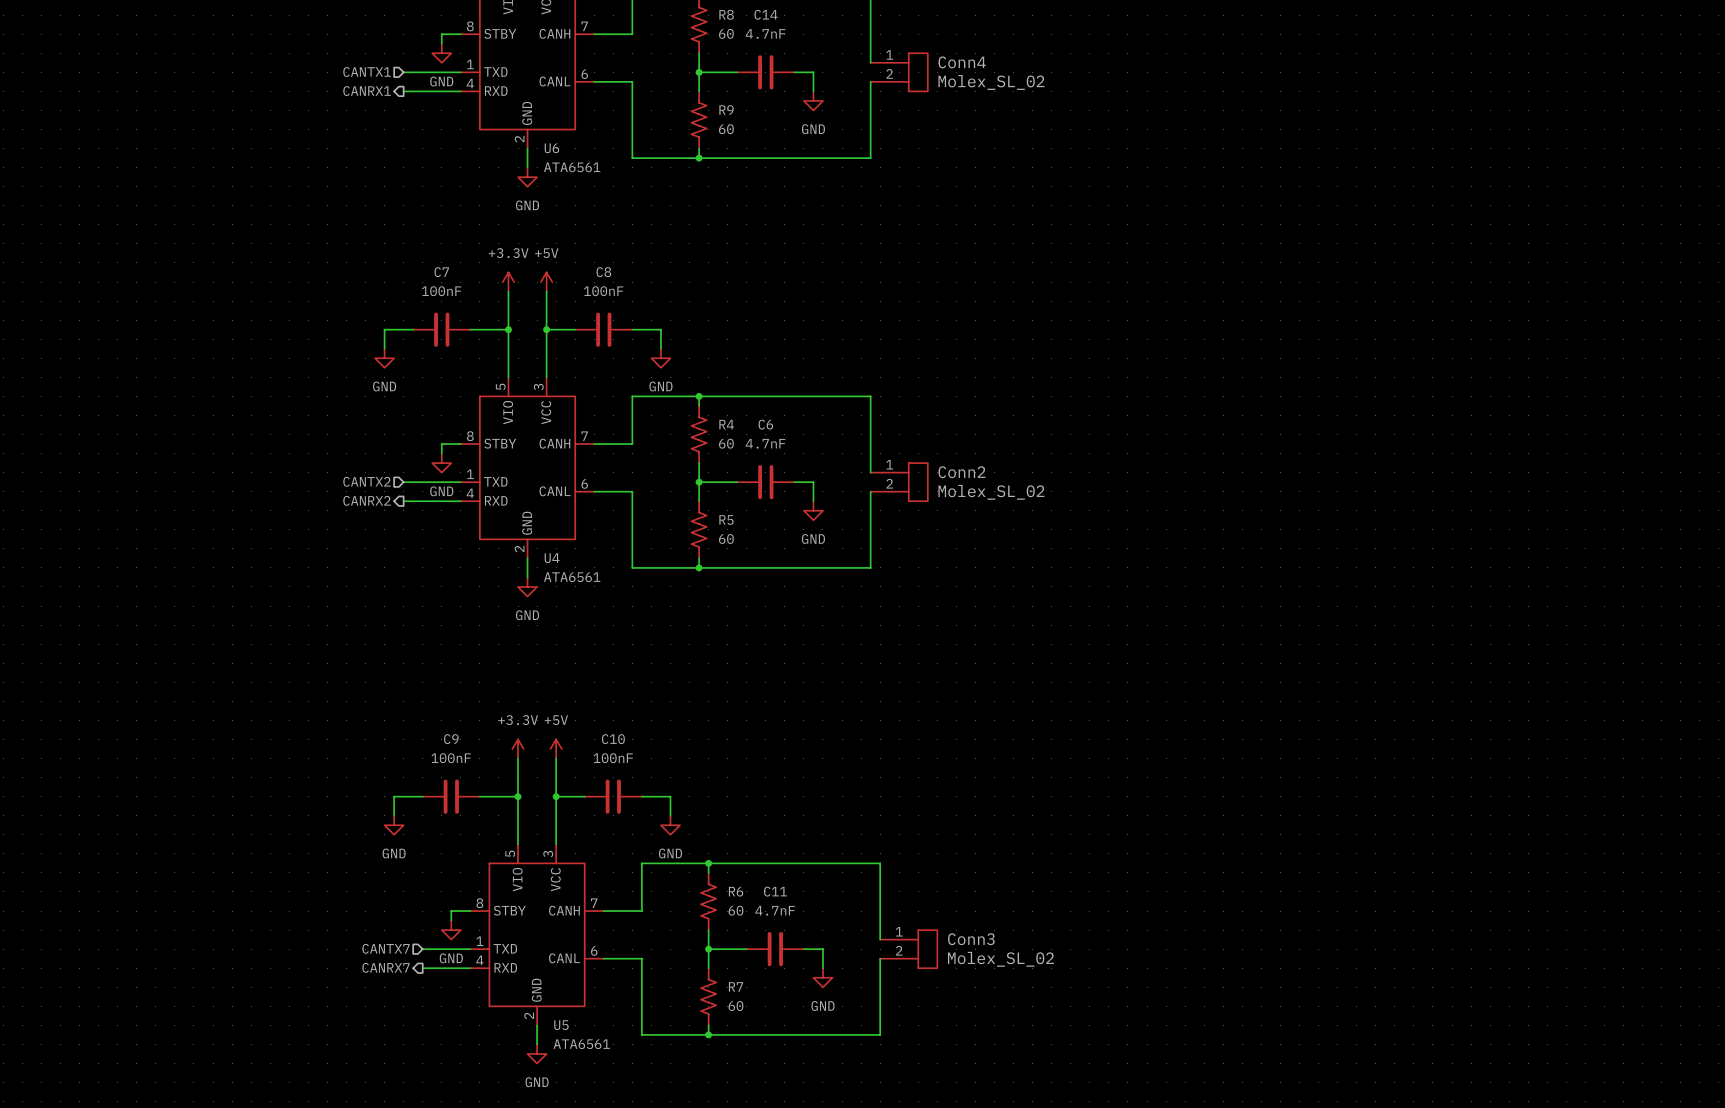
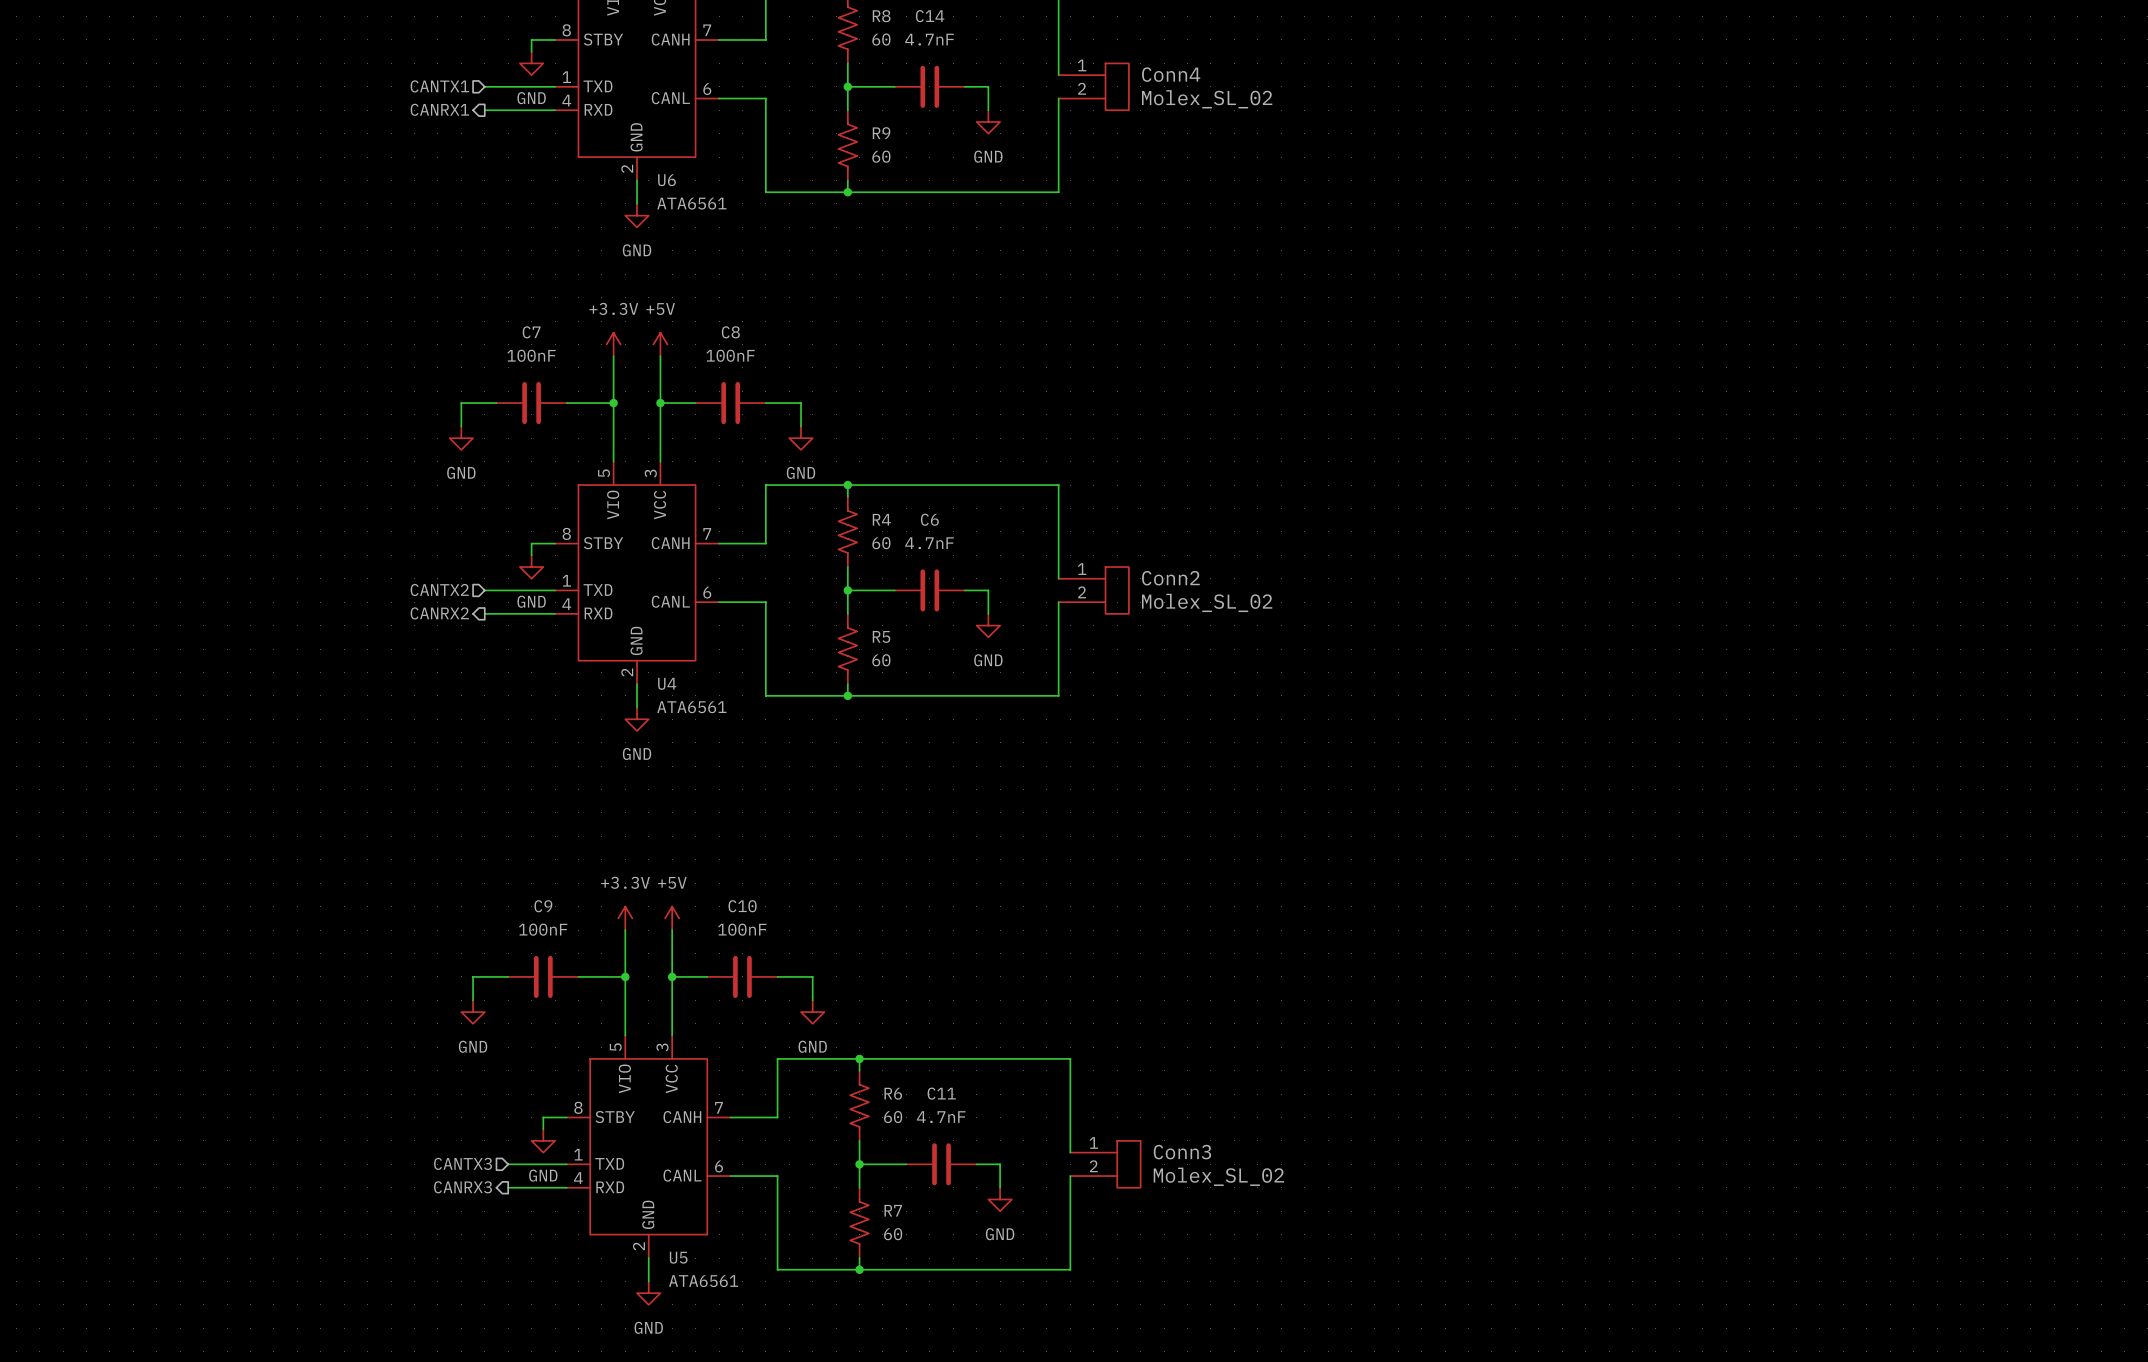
hierarchical label: CANTX7 (386, 948) -> CANTX3 (463, 1163)
hierarchical label: CANRX7 (386, 967) -> CANRX3 (463, 1187)

